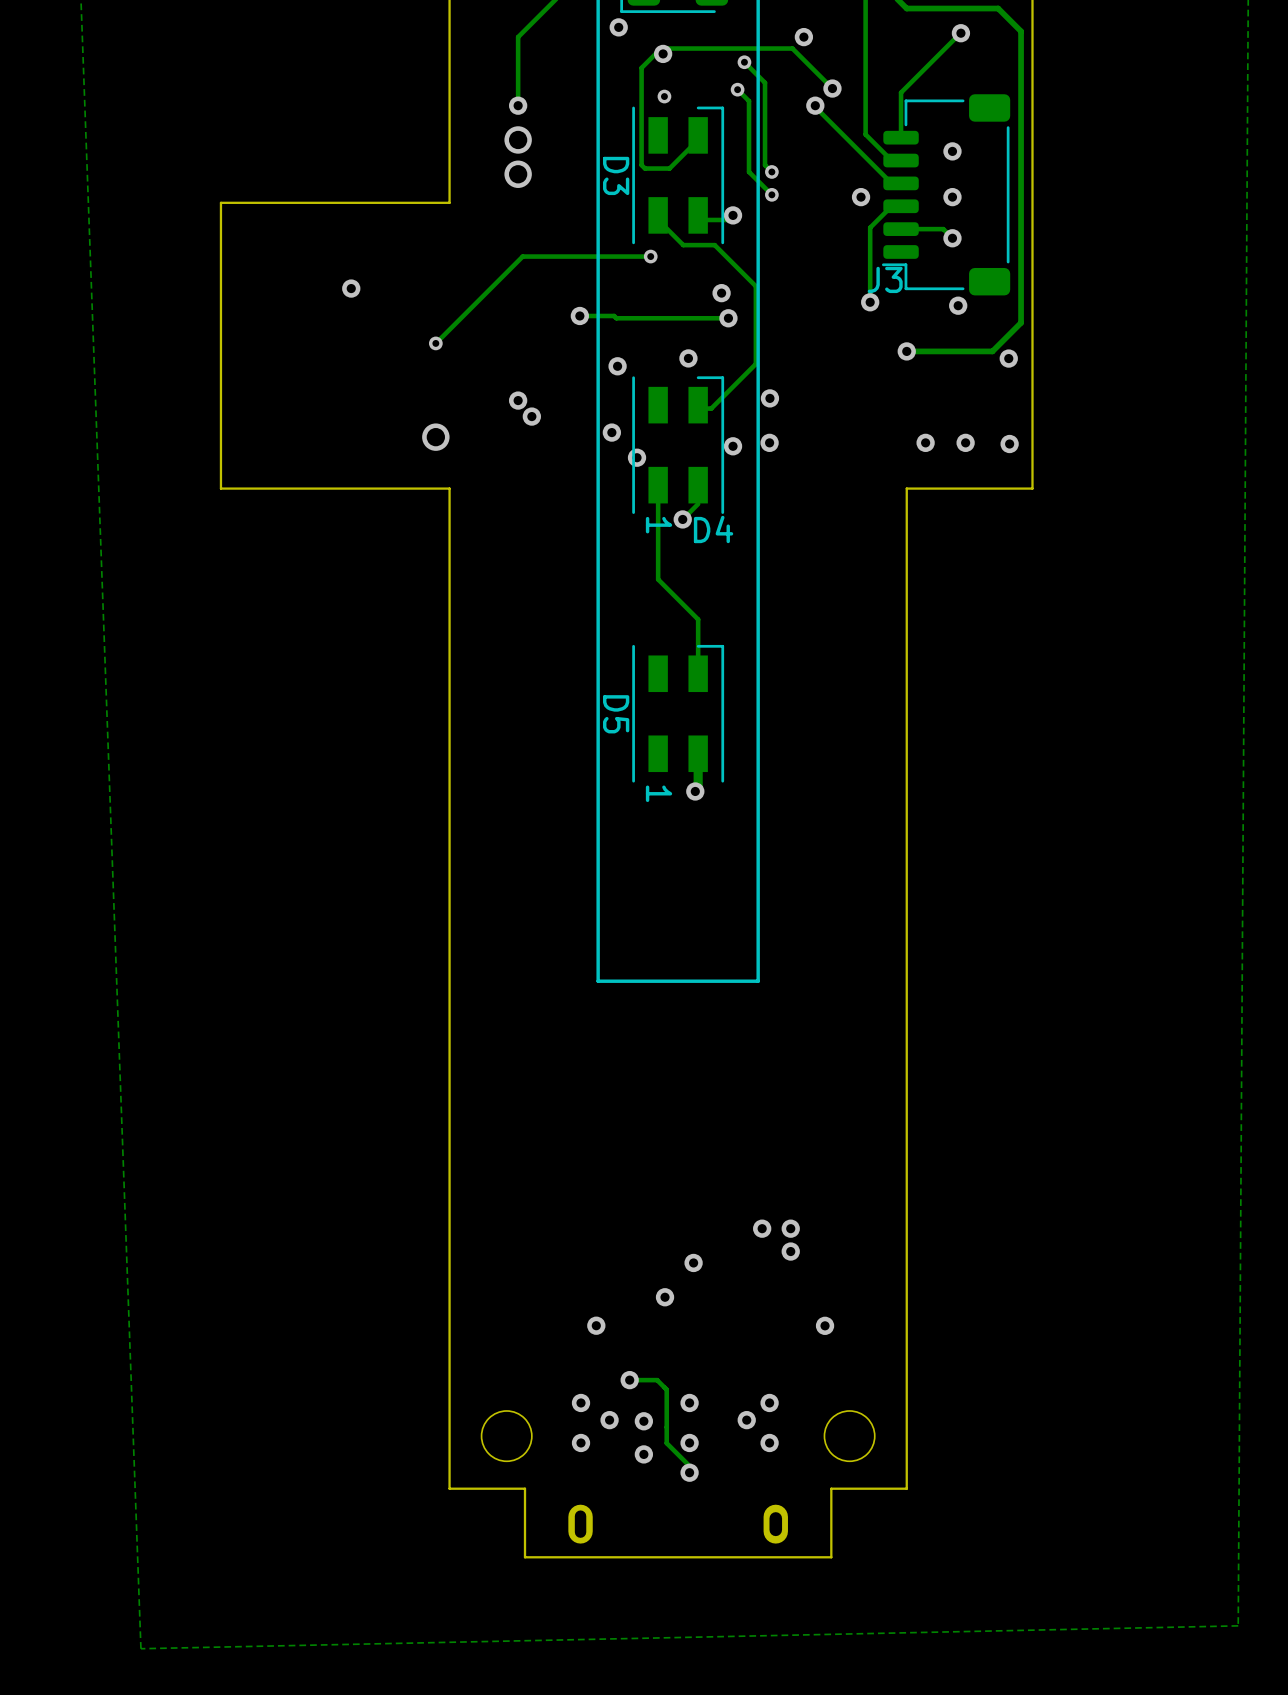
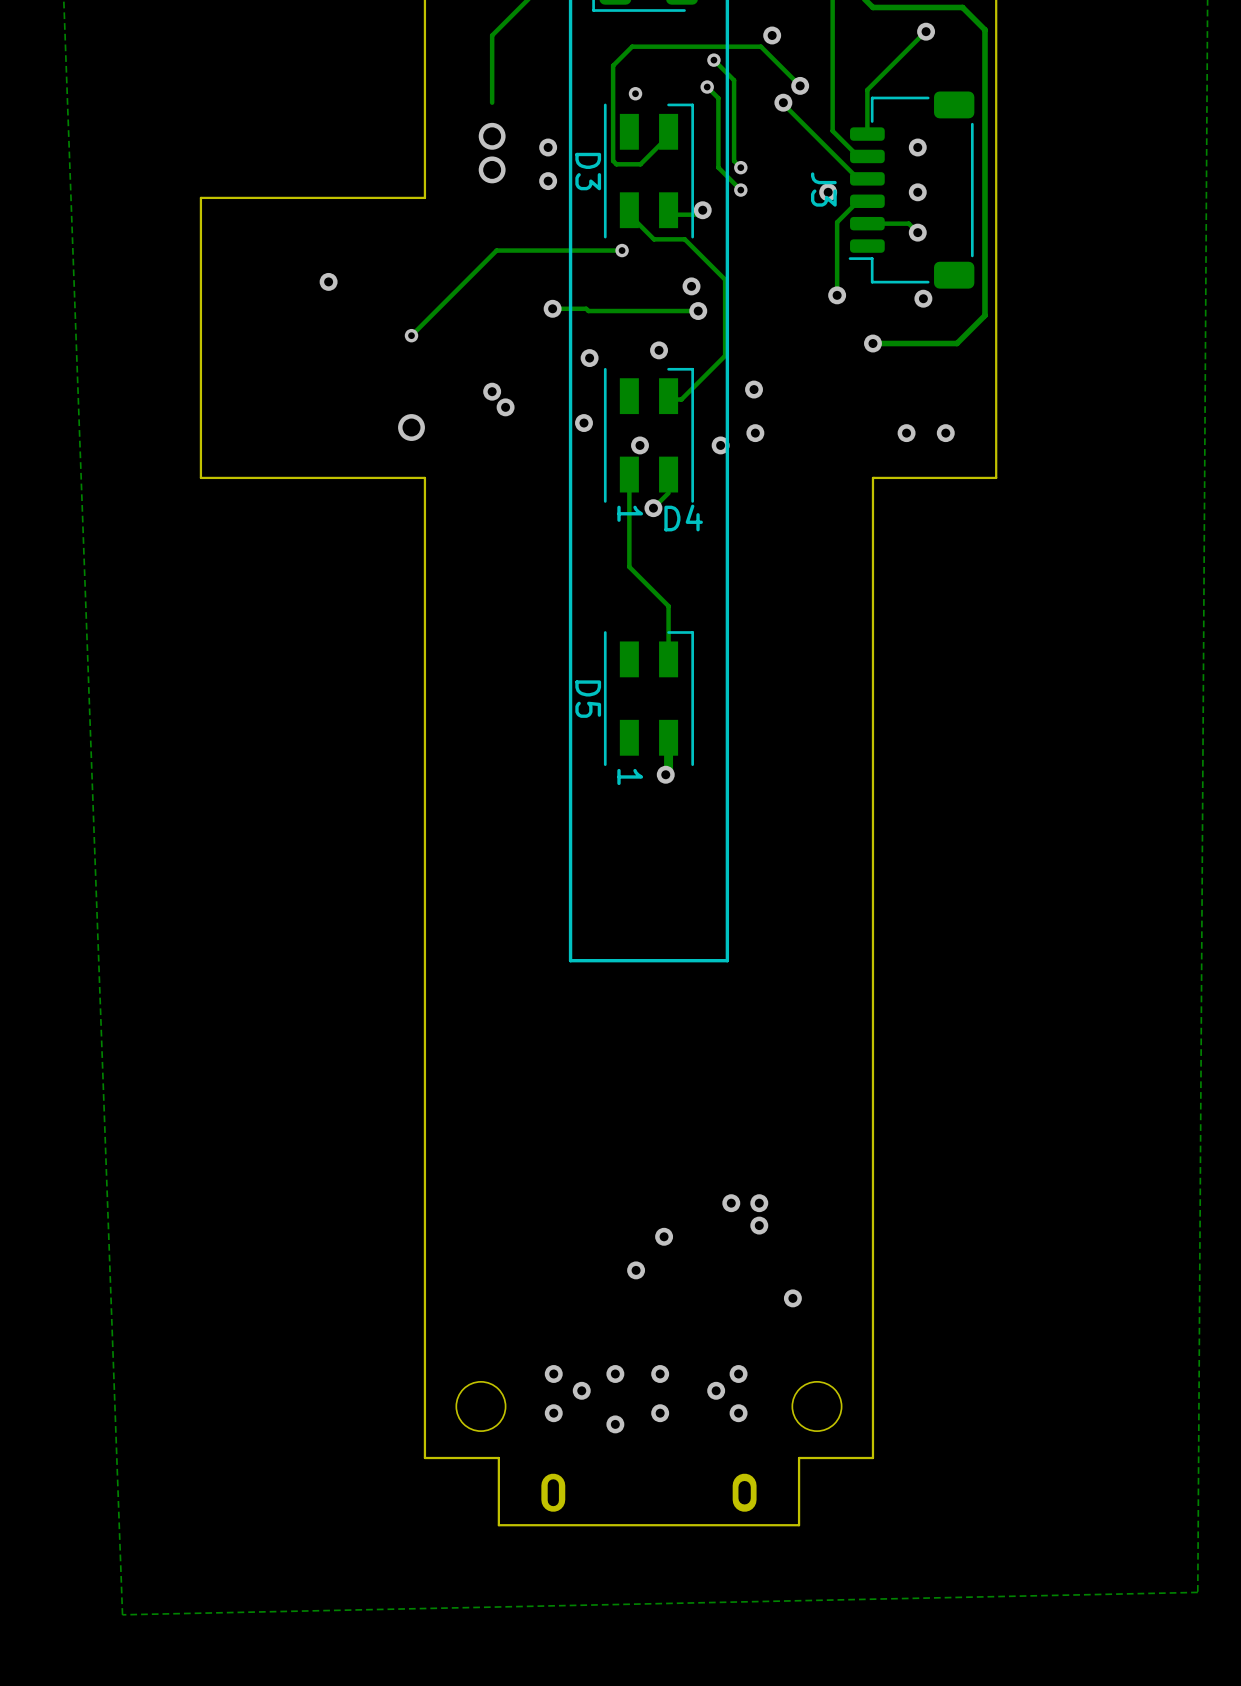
via: (618, 27) -> none
via: (663, 53) -> none
via: (518, 105) -> none
via: none -> (548, 147)
via: none -> (548, 181)
J3 name rotation: 0° (885, 279) -> 90° clockwise (823, 189)
J3 name position: J3 (885, 279) -> J3 (823, 189)
via: (1008, 358) -> none
via position: (769, 398) -> (754, 389)
via: (769, 442) -> none
via: none -> (755, 433)
via position: (925, 442) -> (906, 433)
via position: (965, 442) -> (945, 433)
via: (1009, 444) -> none
via: (733, 446) -> none
via: none -> (720, 445)
via position: (637, 457) -> (640, 445)
via: (596, 1325) -> none
track: (629, 1380) (657, 1380) (666, 1389) (666, 1443) (689, 1466) (689, 1472) -> none
via: (629, 1380) -> none
via position: (643, 1421) -> (615, 1373)
via: (689, 1472) -> none

